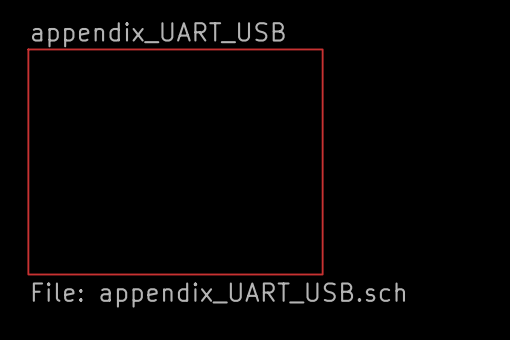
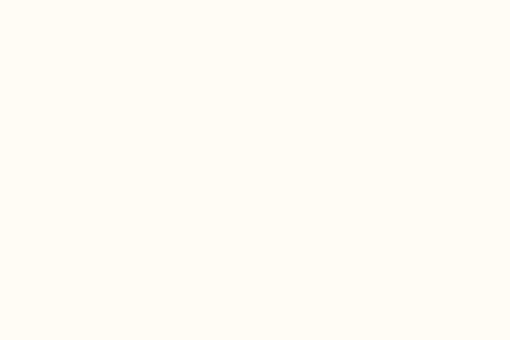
sheet appendix_UART_USB: File: appendix_UART_USB.sch (175, 161) -> none

